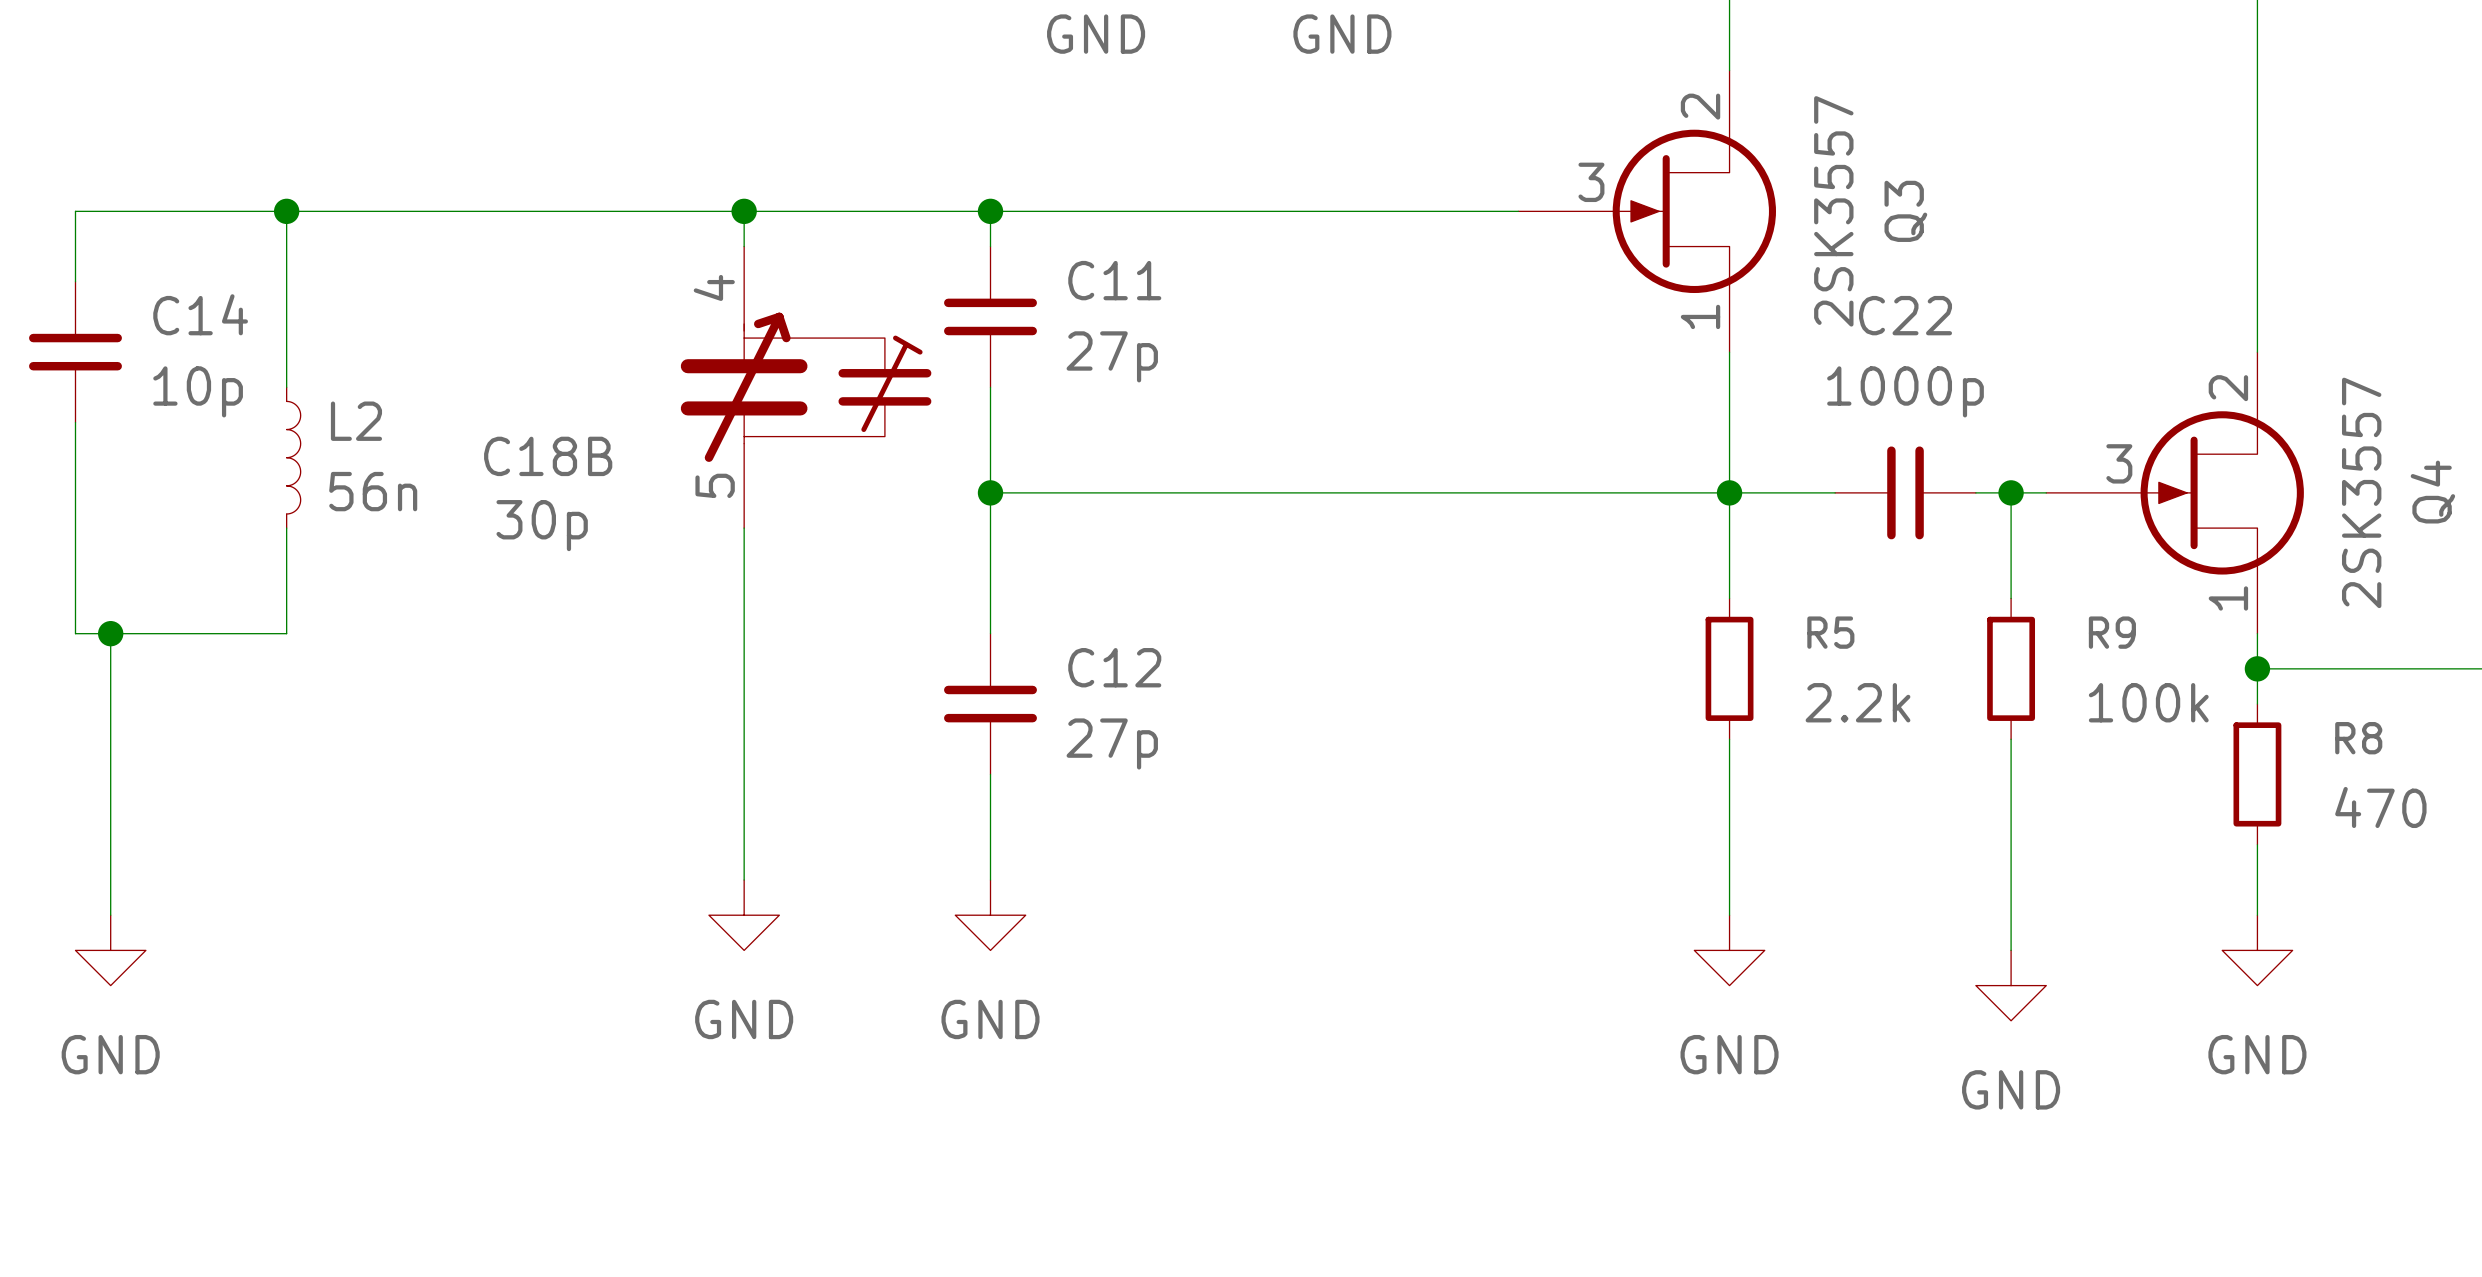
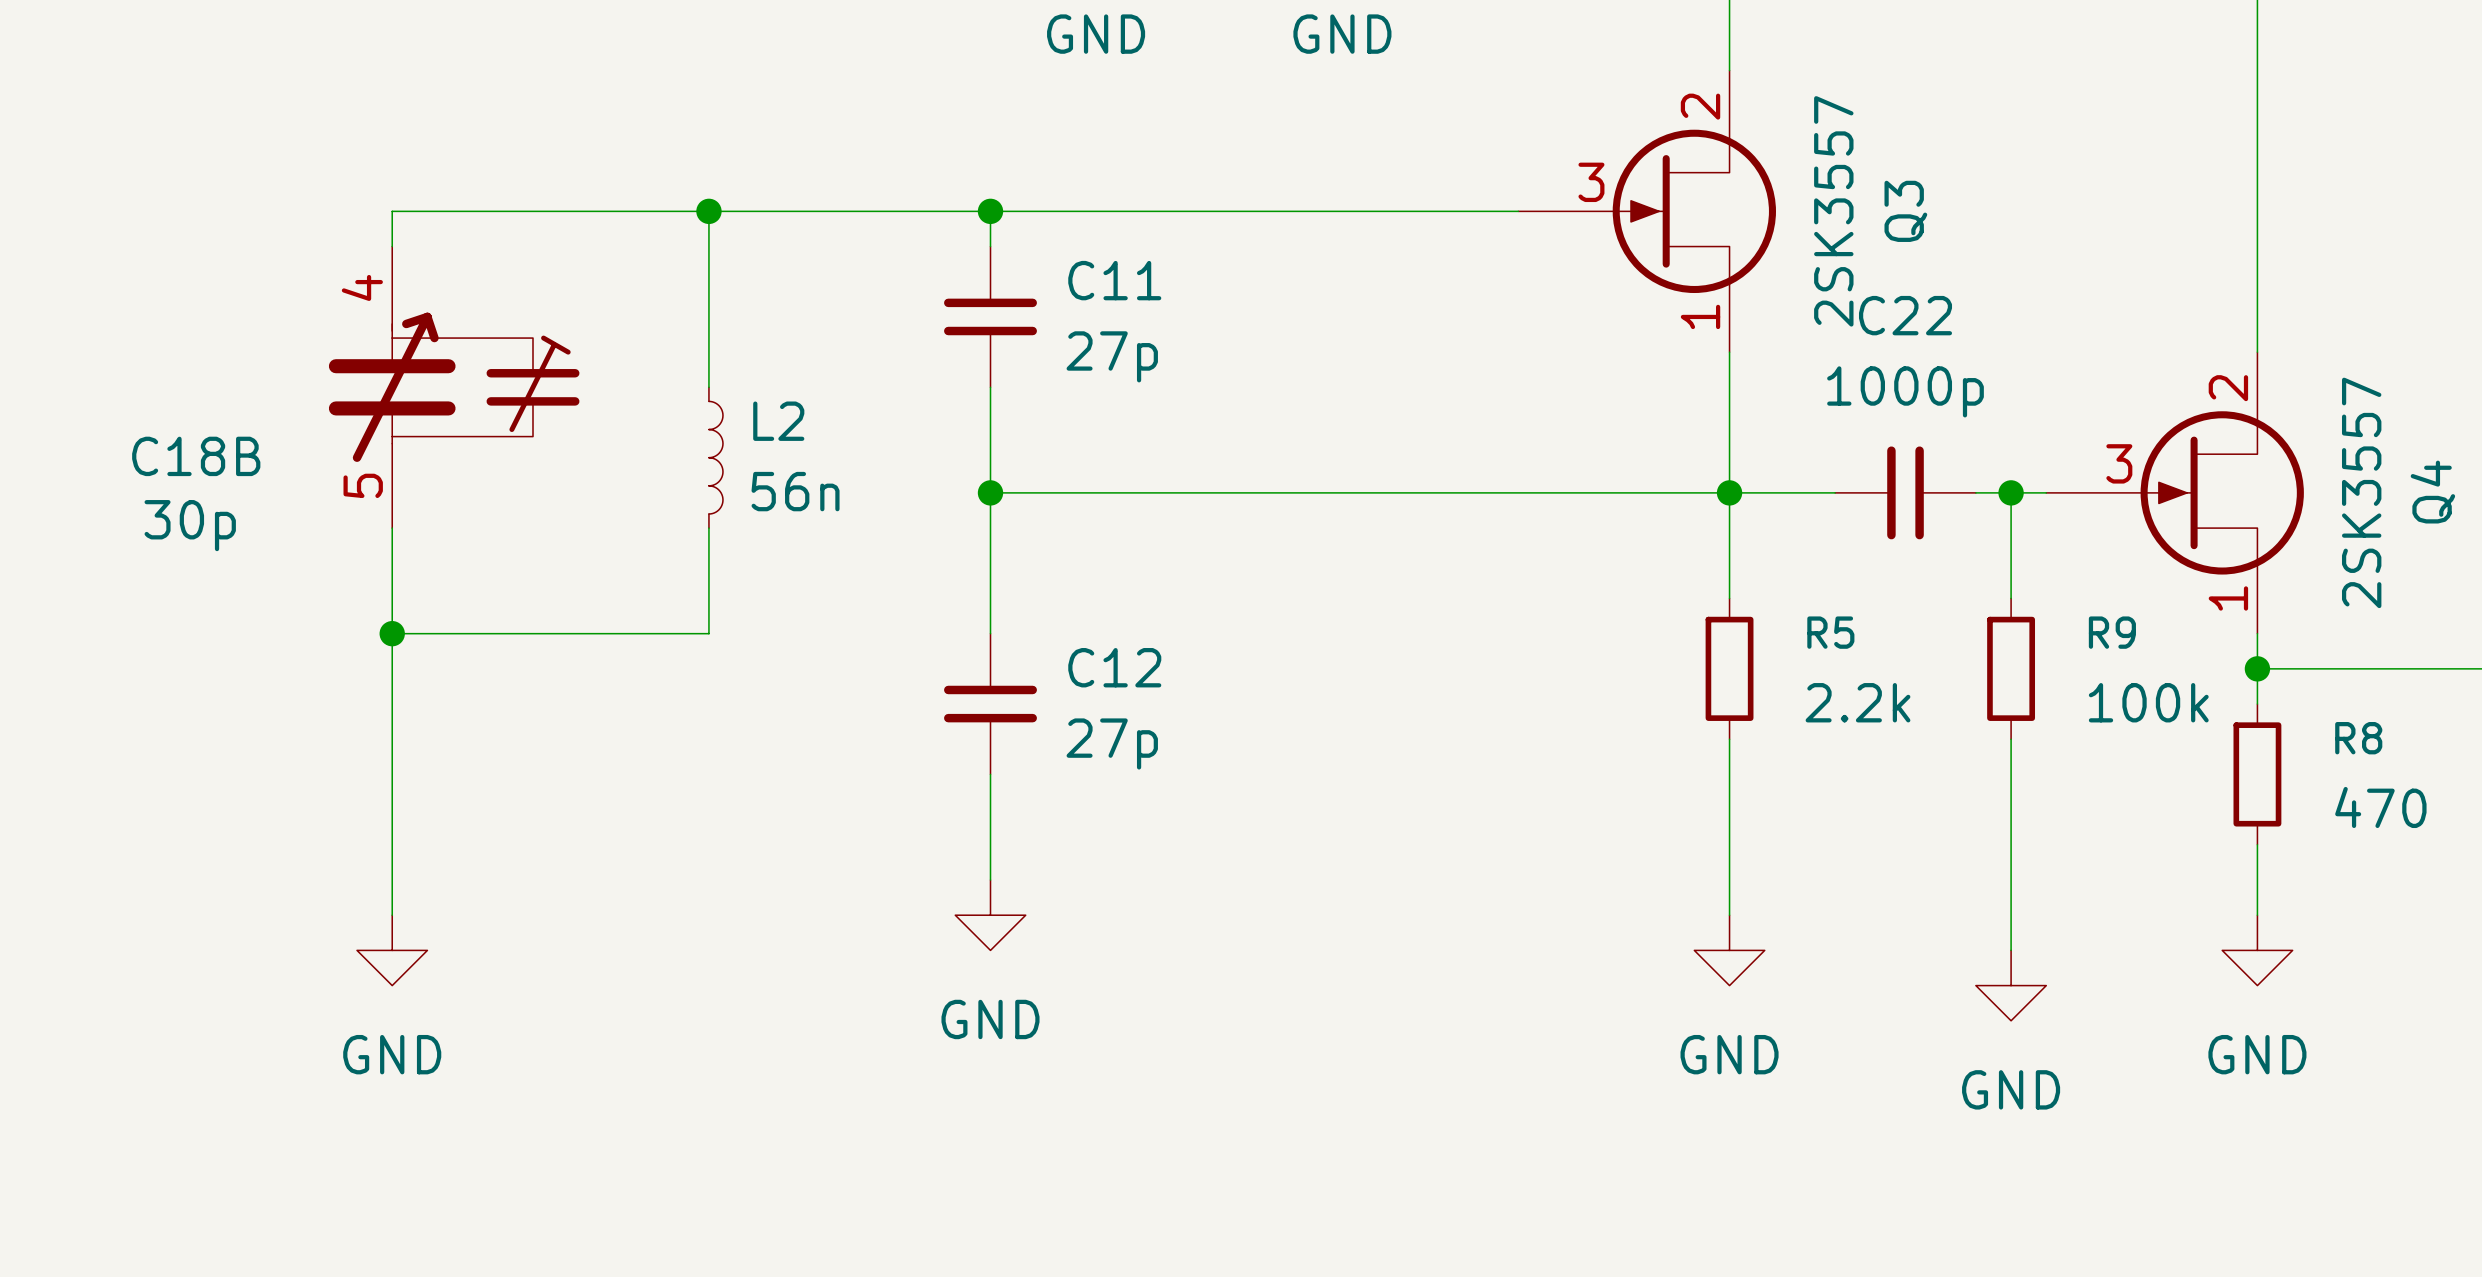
wire: (286, 211) (286, 387) -> (708, 211) (708, 387)
junction: (286, 211) -> none
wire: (392, 211) (75, 211) (75, 281) -> (392, 211) (392, 246)
wire: (744, 211) (744, 246) -> none
junction position: (744, 211) -> (708, 211)
C14: 10p (75, 352) -> none
C18B position: (806, 387) -> (454, 387)
wire: (75, 422) (75, 633) (286, 633) (286, 528) -> none
L2 position: (293, 457) -> (715, 457)
wire: none -> (392, 528) (392, 915)
wire: none -> (708, 528) (708, 633) (392, 633)
wire: (744, 528) (744, 880) -> none
wire: (110, 633) (110, 915) -> none
junction: (110, 633) -> none
junction: none -> (392, 633)
power symbol: GND (744, 915) -> none
power symbol: GND (110, 950) -> none
power symbol: none -> GND (392, 950)

